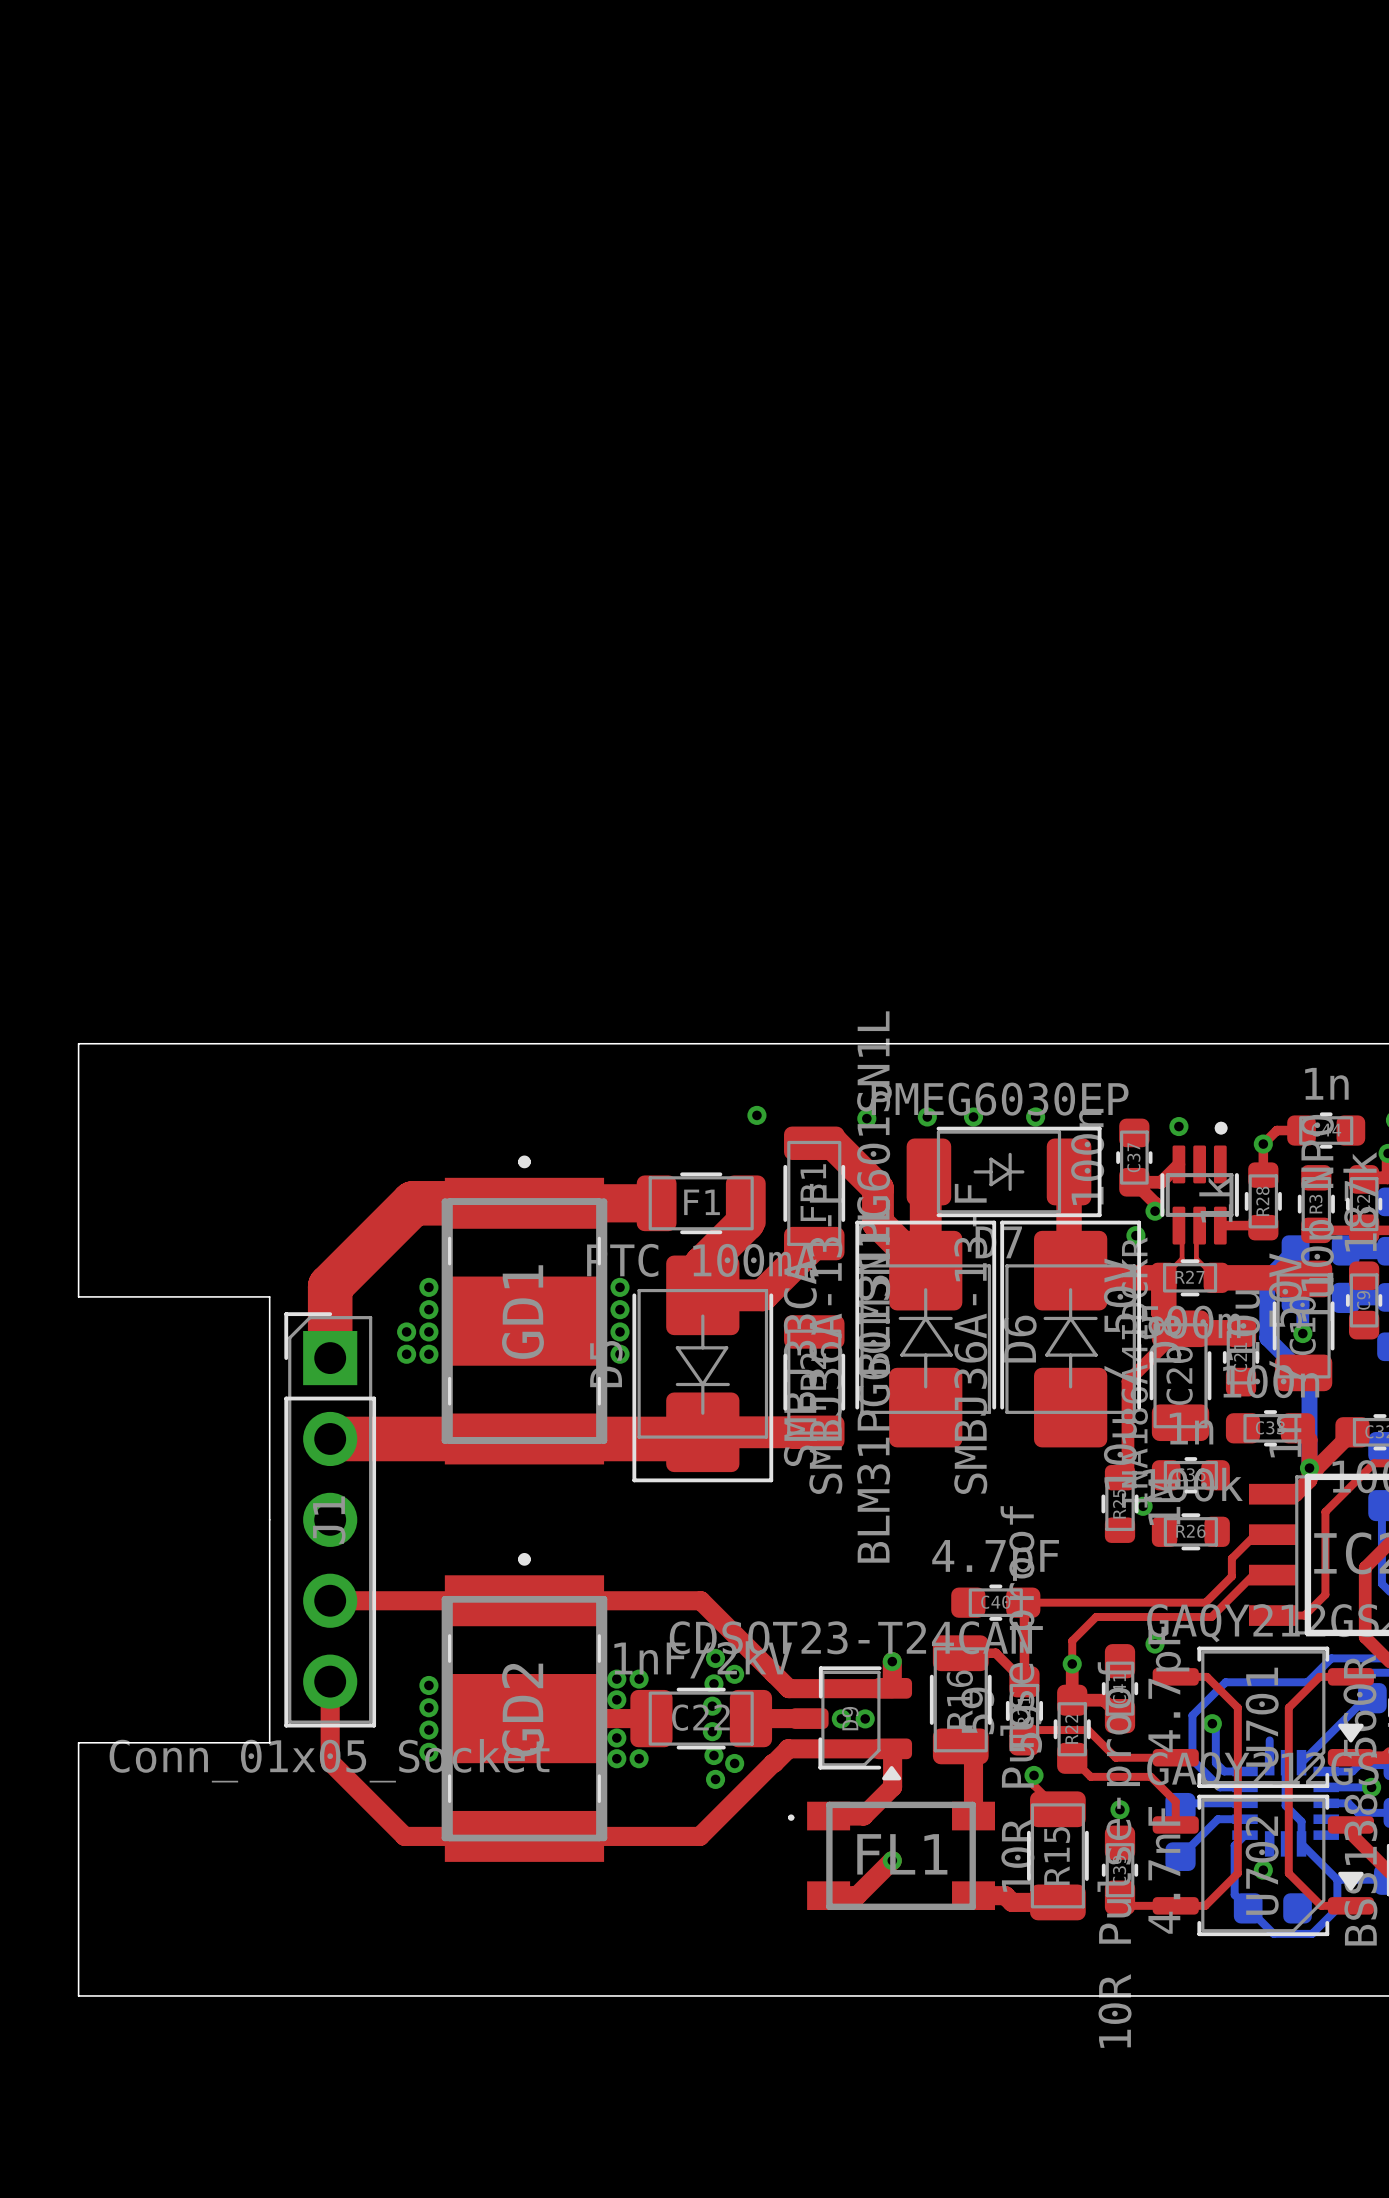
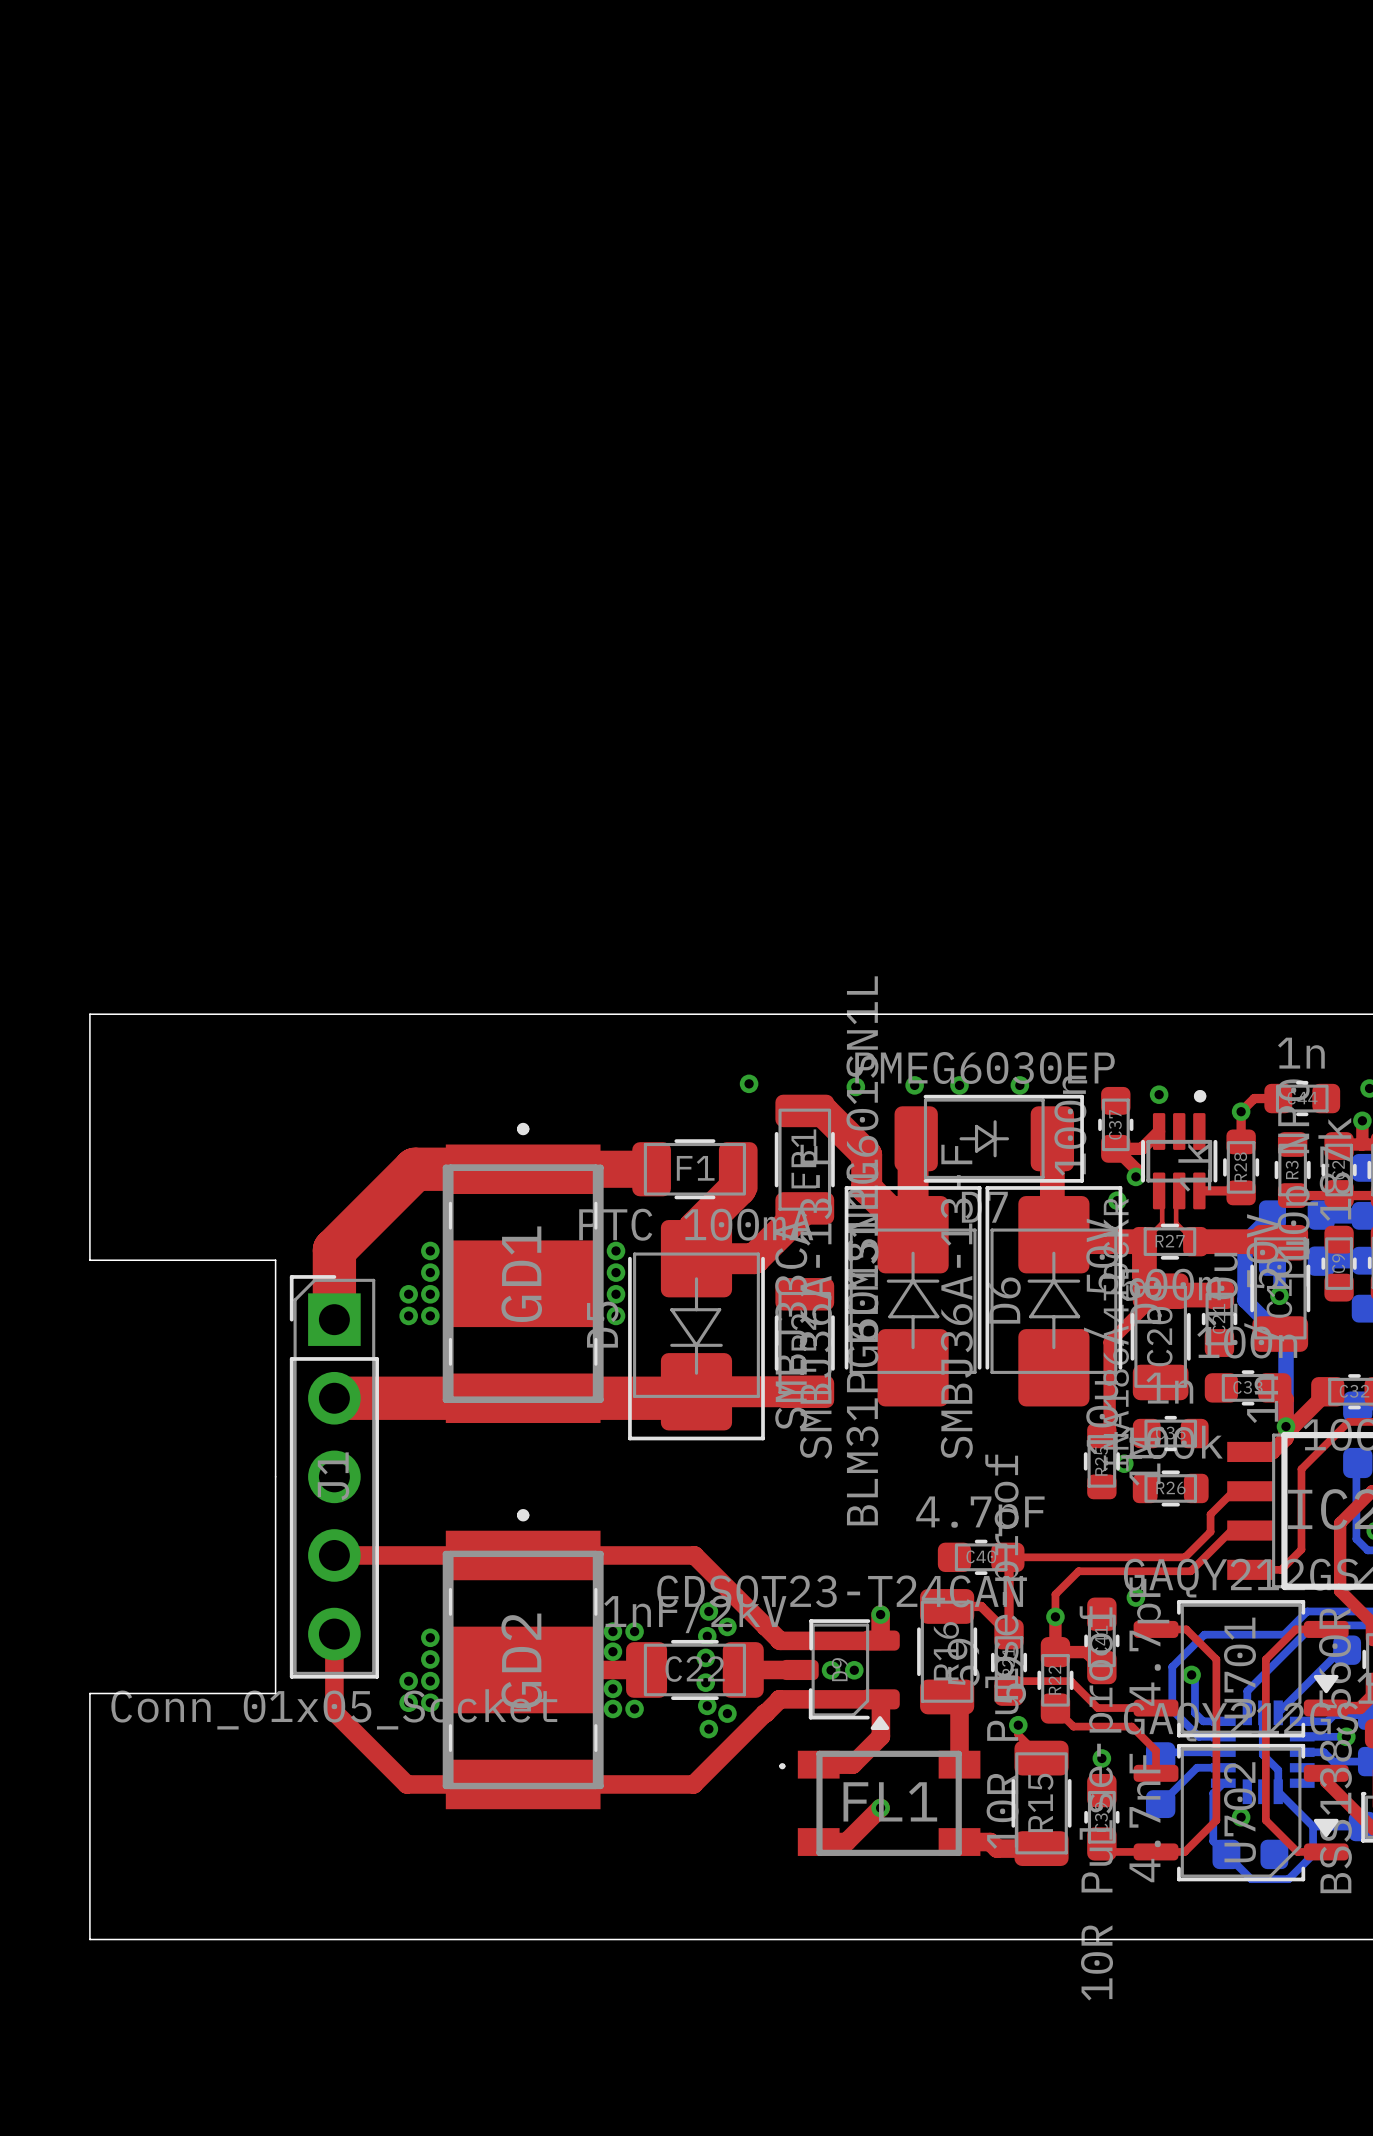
bottom track: none -> (1313, 1625) (1247, 1691)
via: none -> (408, 1681)
via: none -> (408, 1702)

